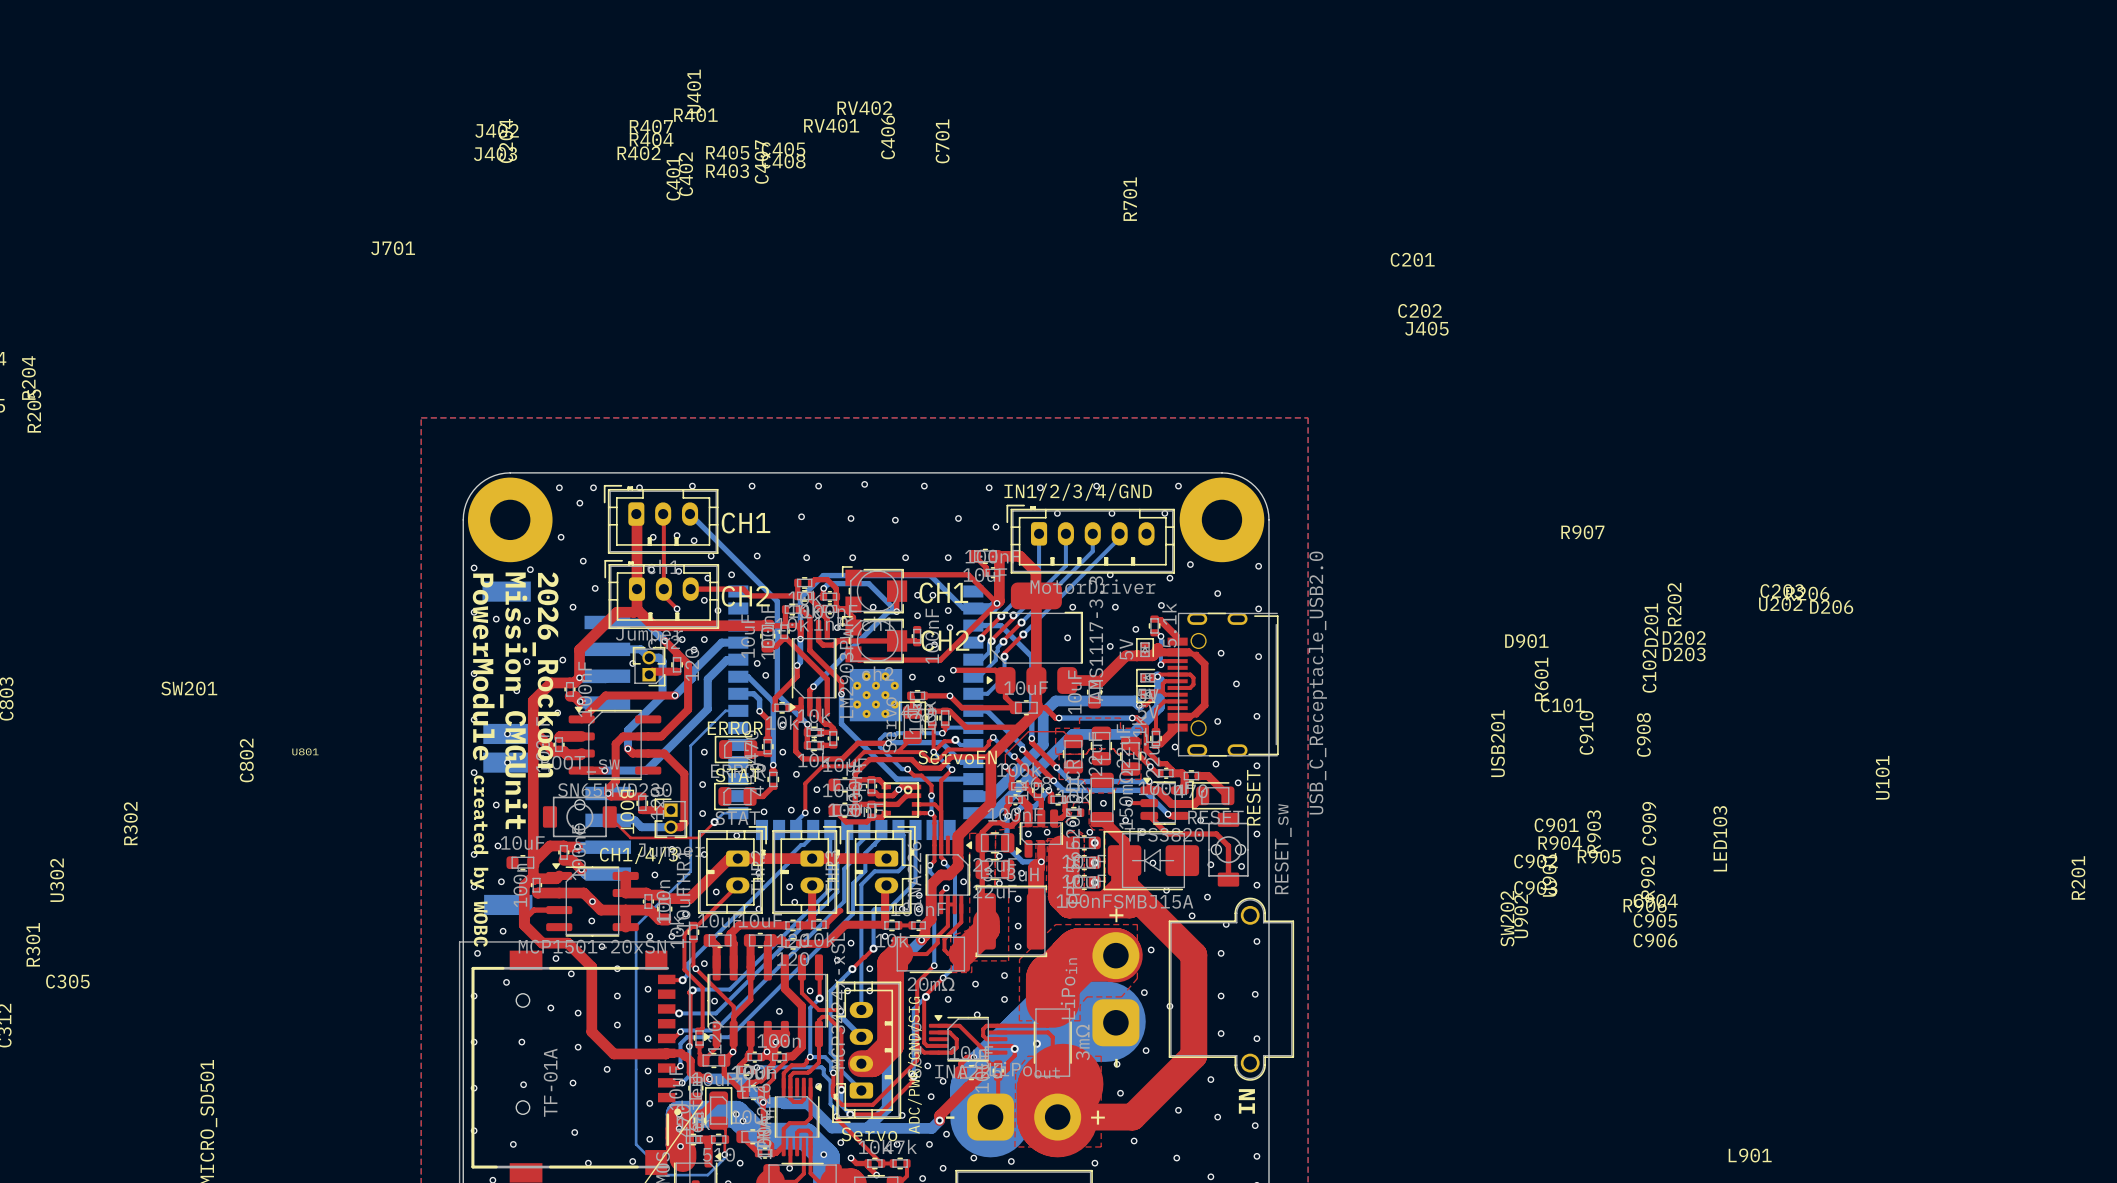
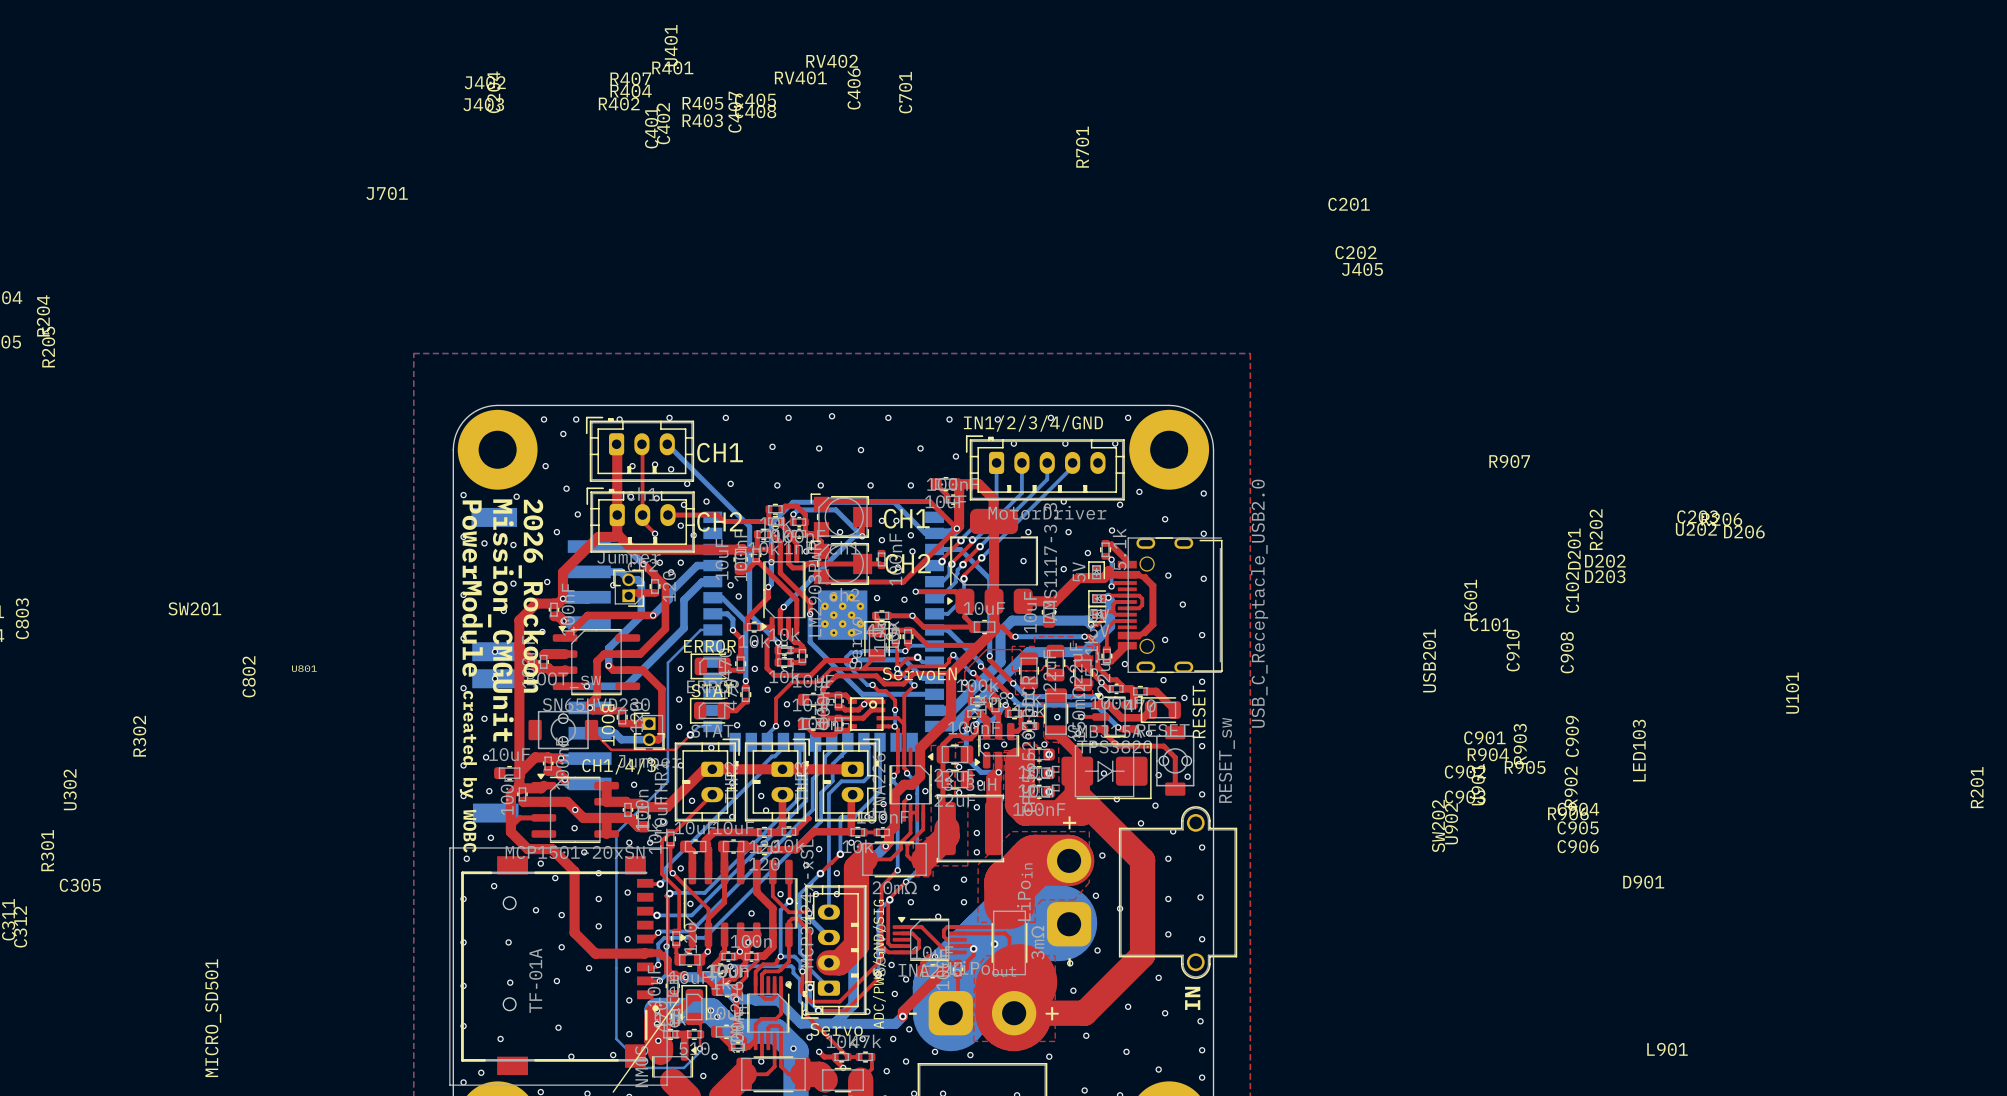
D901 name position: D901 (1526, 641) -> D901 (1643, 882)
D901 rotation: 0° (1151, 860) -> 180° (1106, 771)

